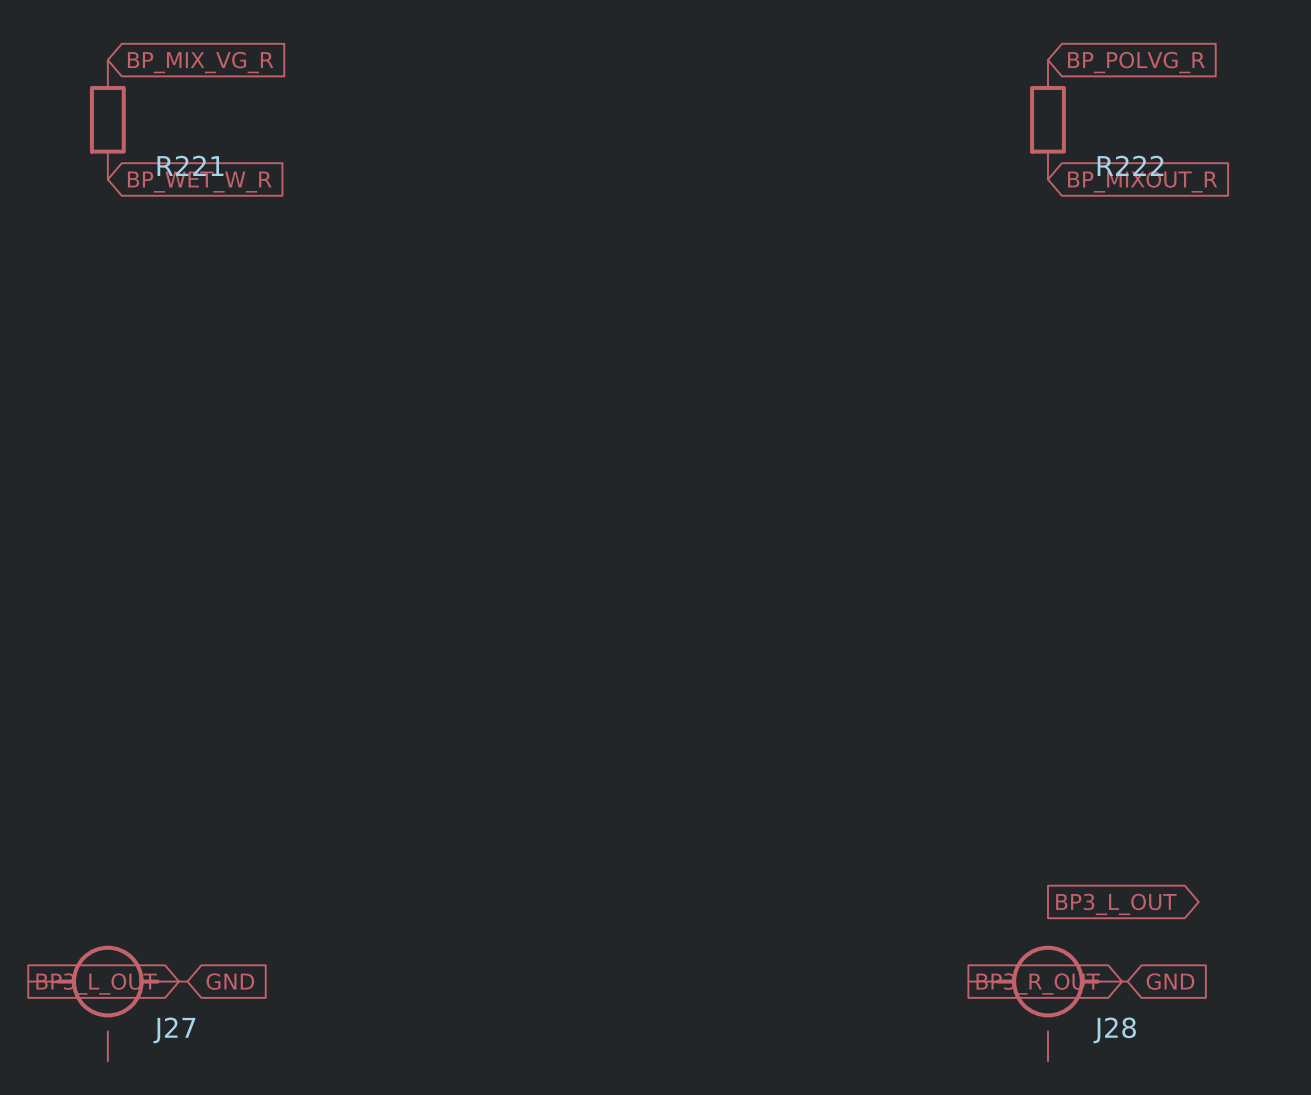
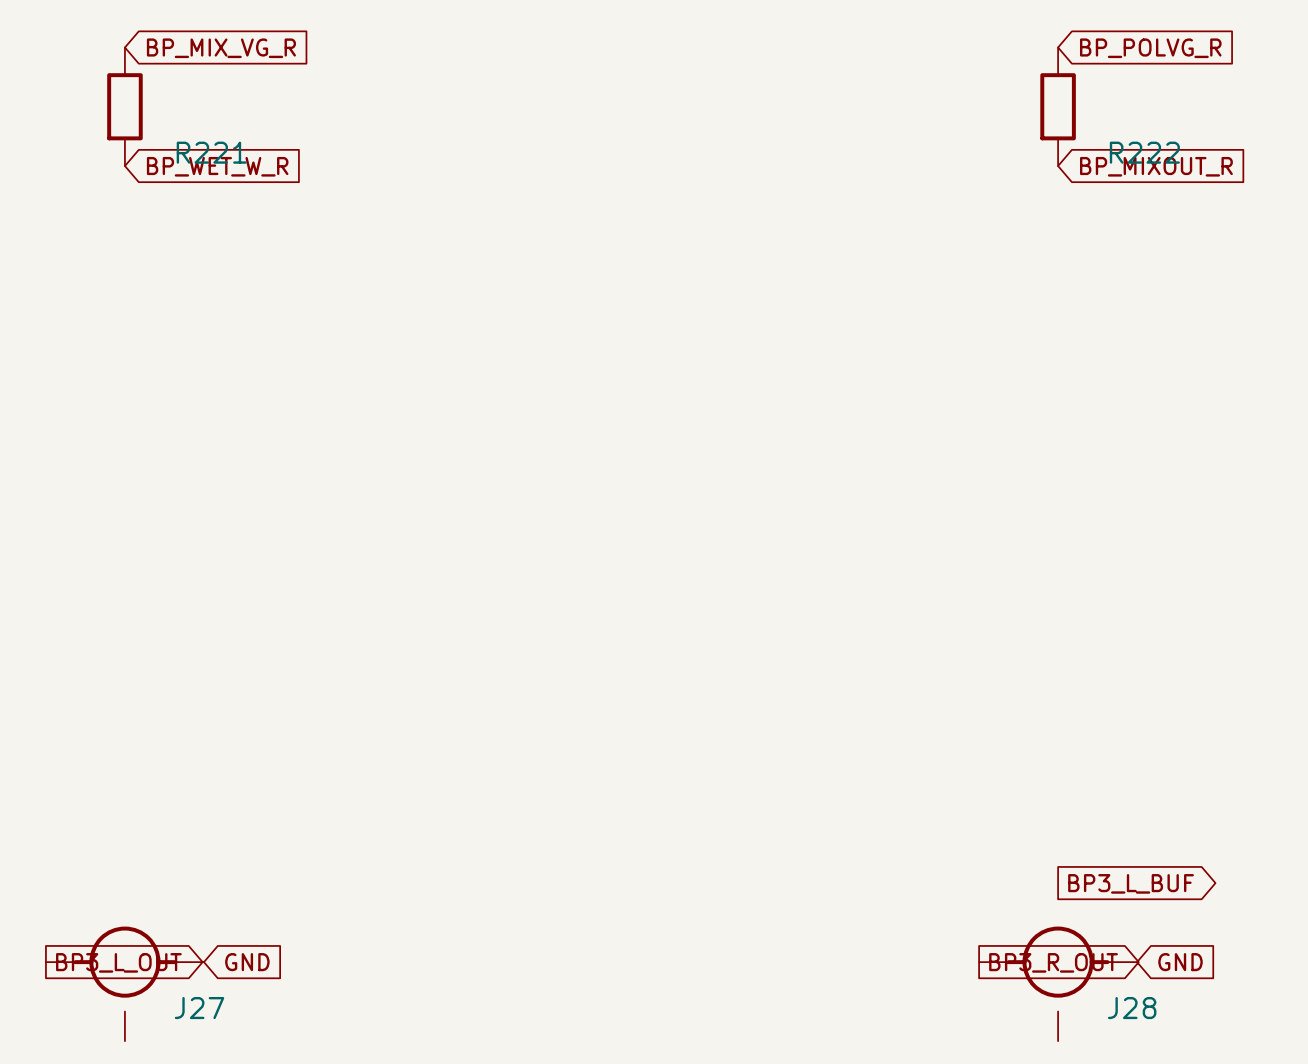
global label: BP3_L_OUT (1116, 904) -> BP3_L_BUF (1131, 883)

